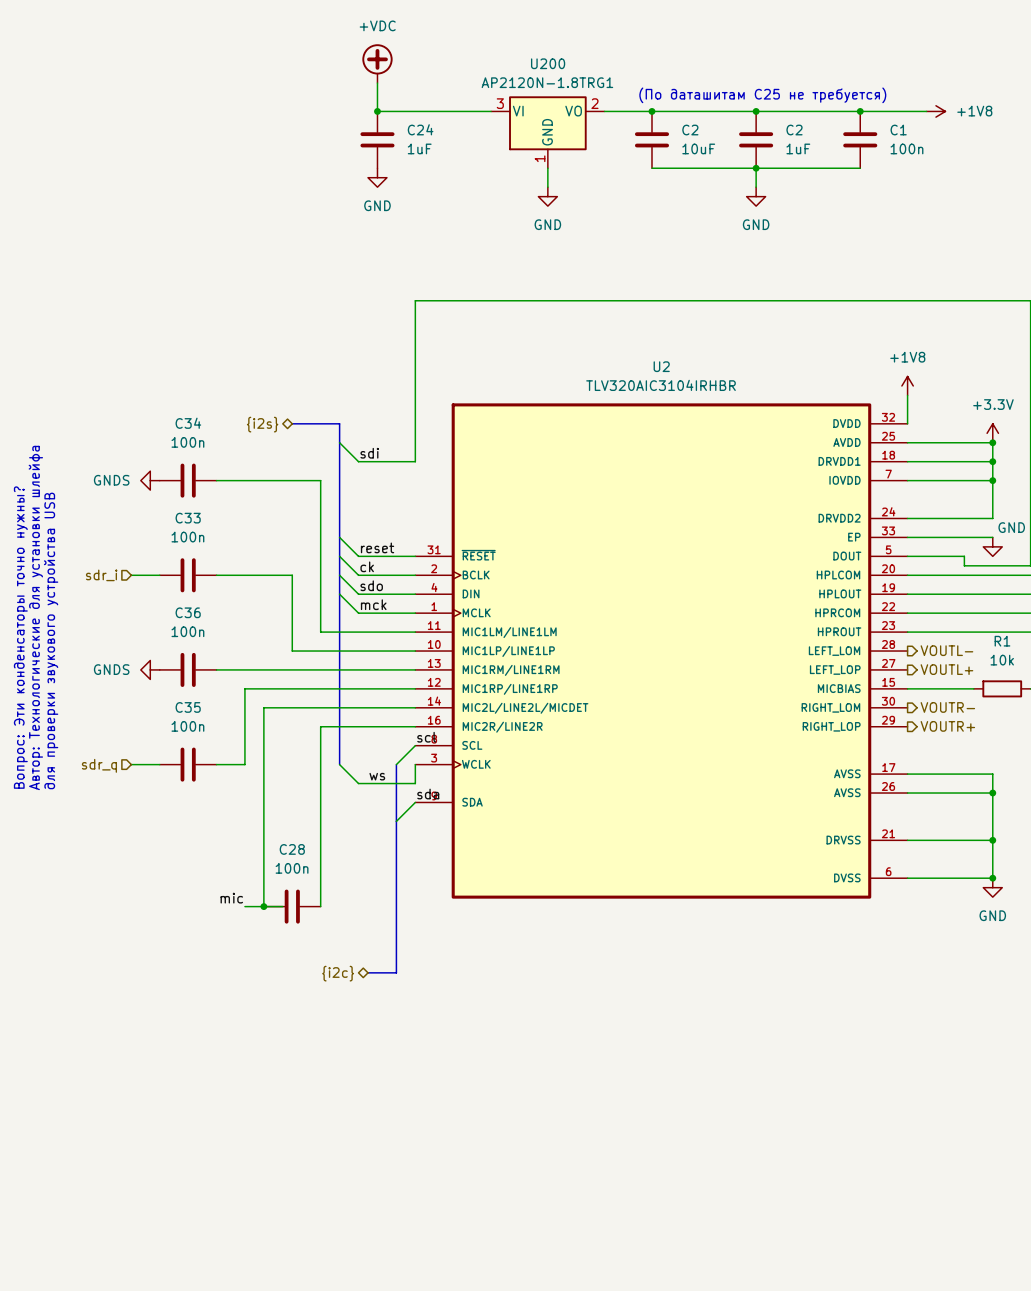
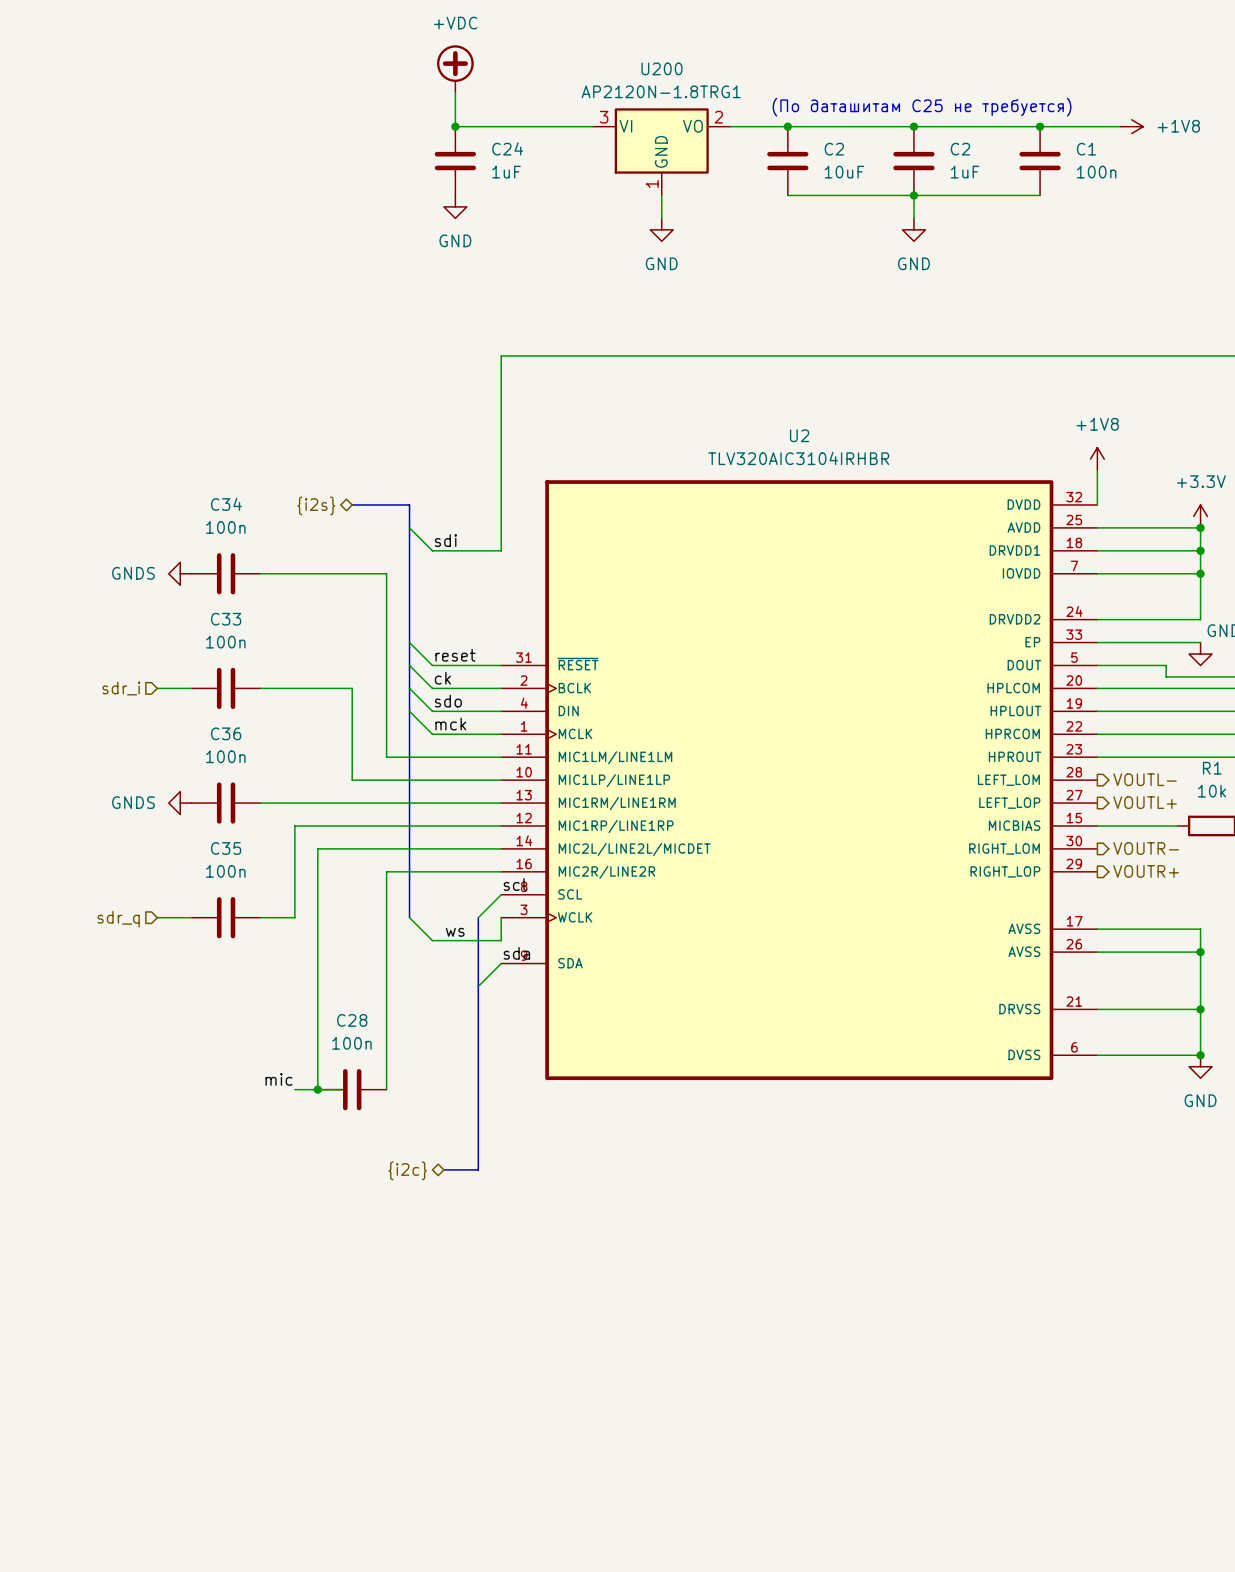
text: Автор: Технологические для установки шлейфа (35, 617) -> none
text: Вопрос: Эти конденсаторы точно нужны? (20, 637) -> none
text: для проверки звукового устройства USB (51, 640) -> none

